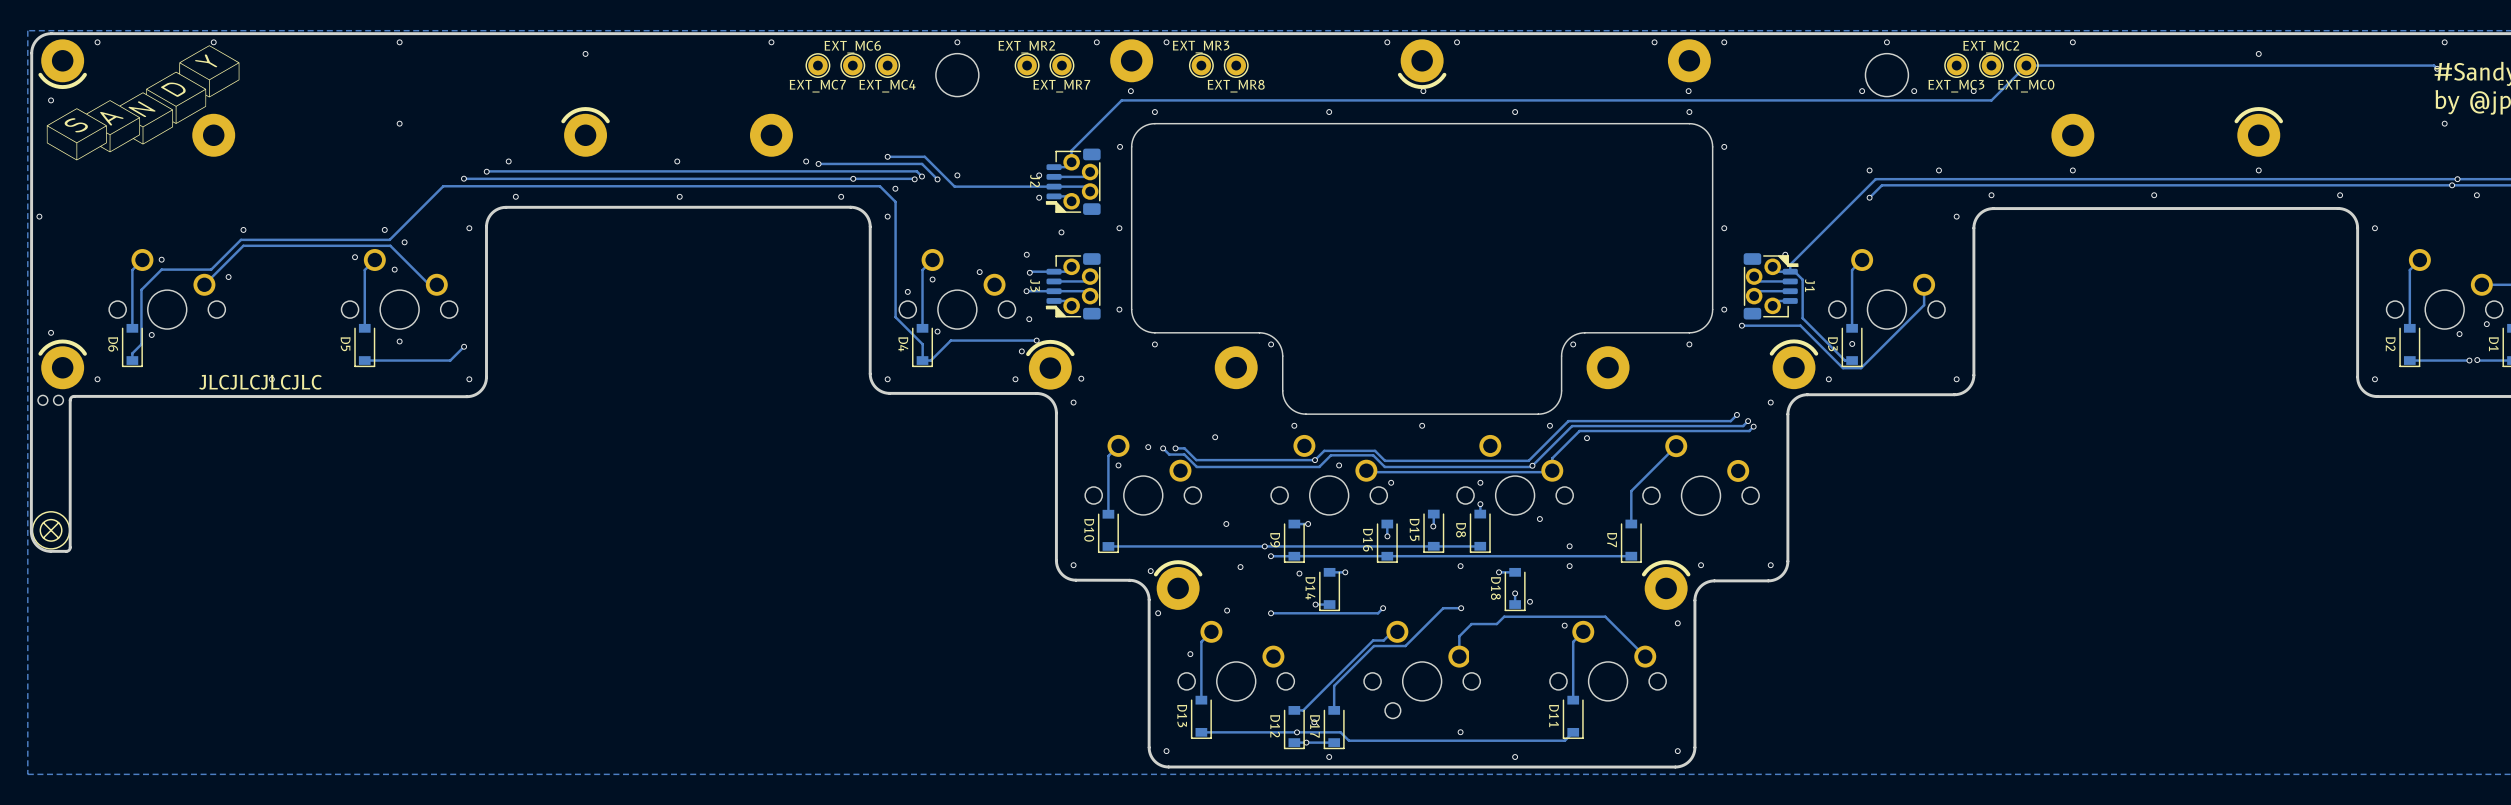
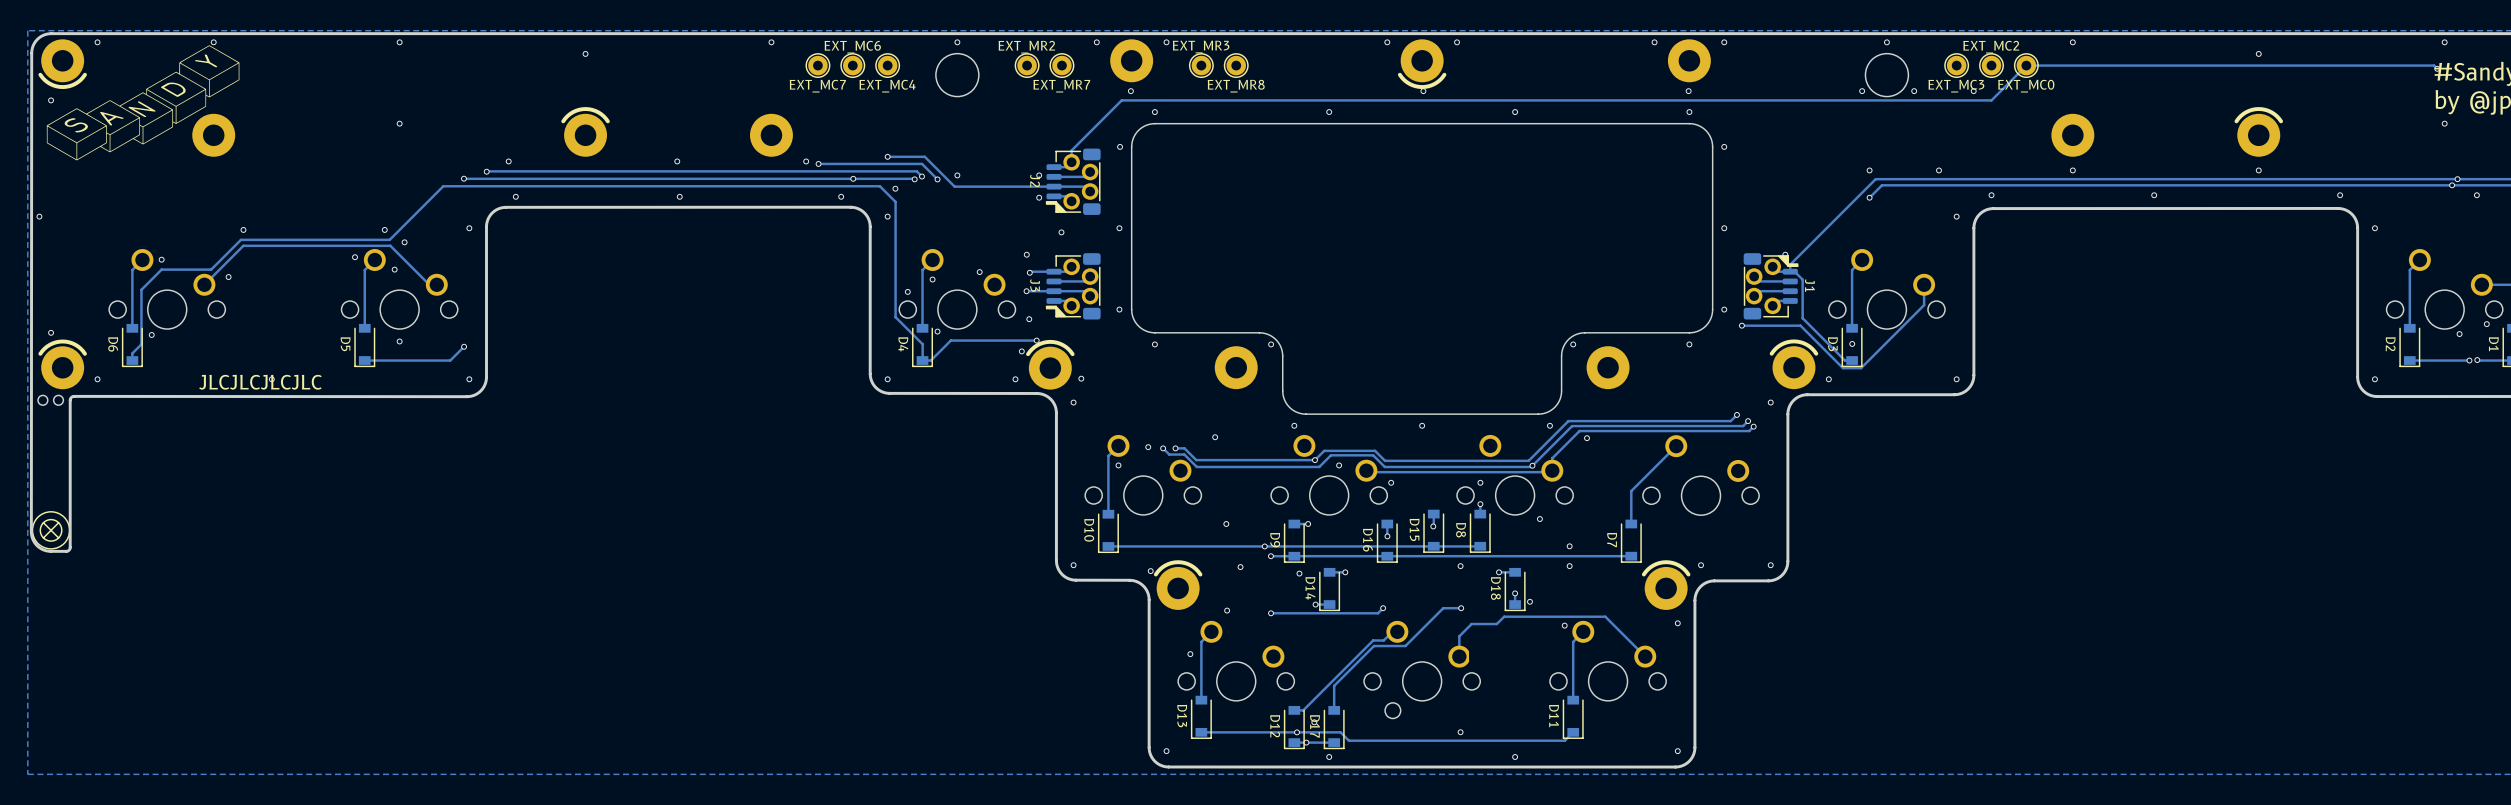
via: (1158, 613) -> none

